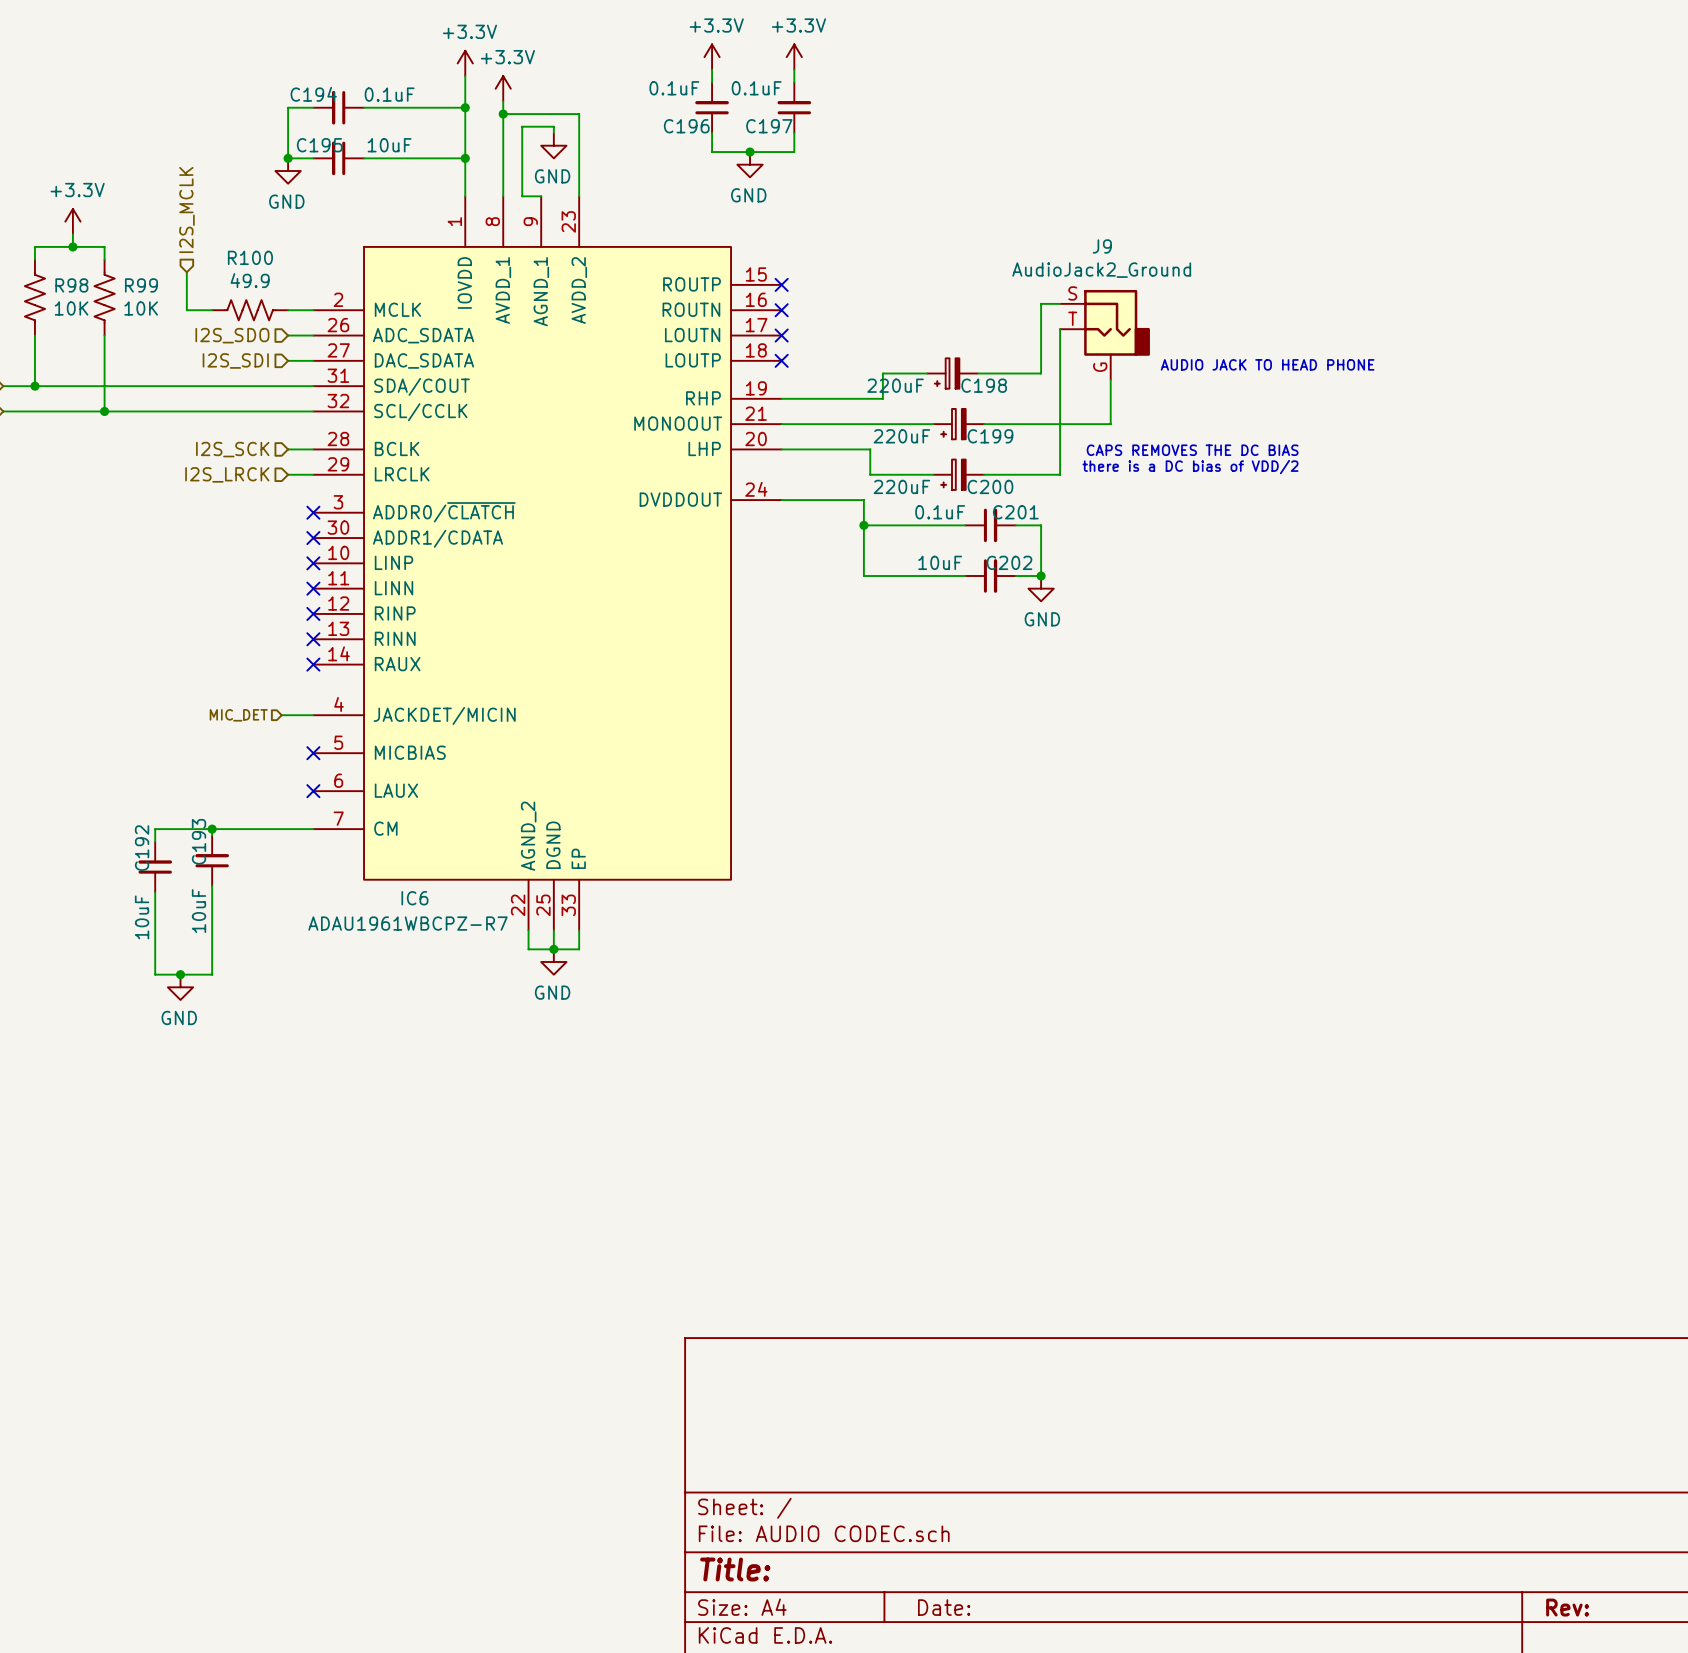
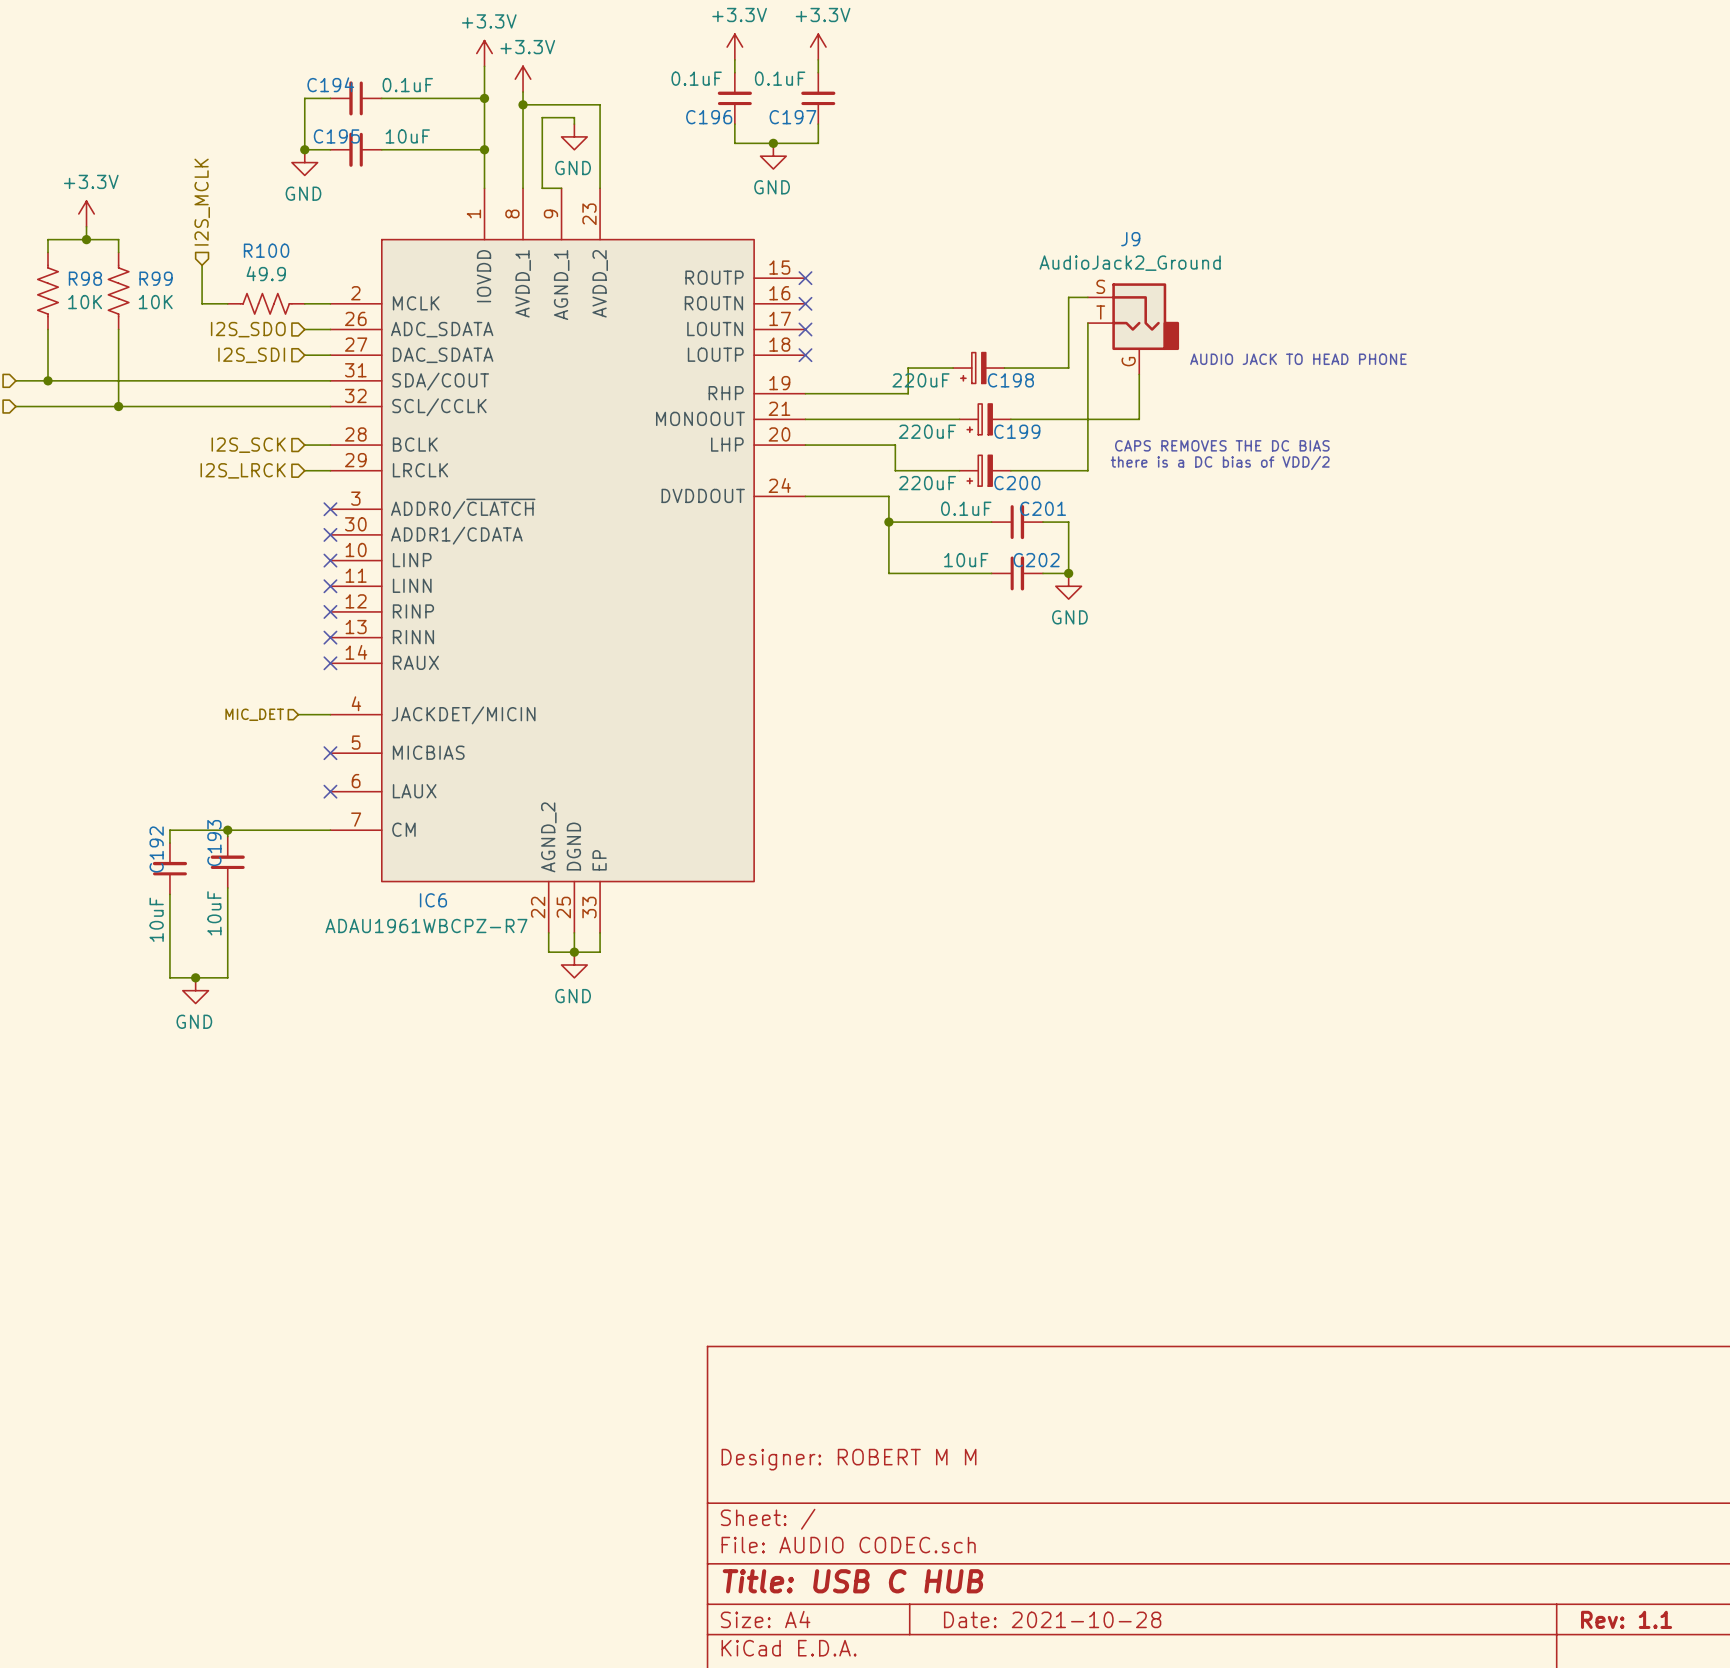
title block: none -> Designer: ROBERT M M (848, 1459)
title block: Title: (735, 1569) -> Title: USB C HUB (853, 1581)
title block: Date: (944, 1607) -> Date: 2021-10-28 (1052, 1619)
title block: Rev: (1567, 1607) -> Rev: 1.1 (1626, 1619)

